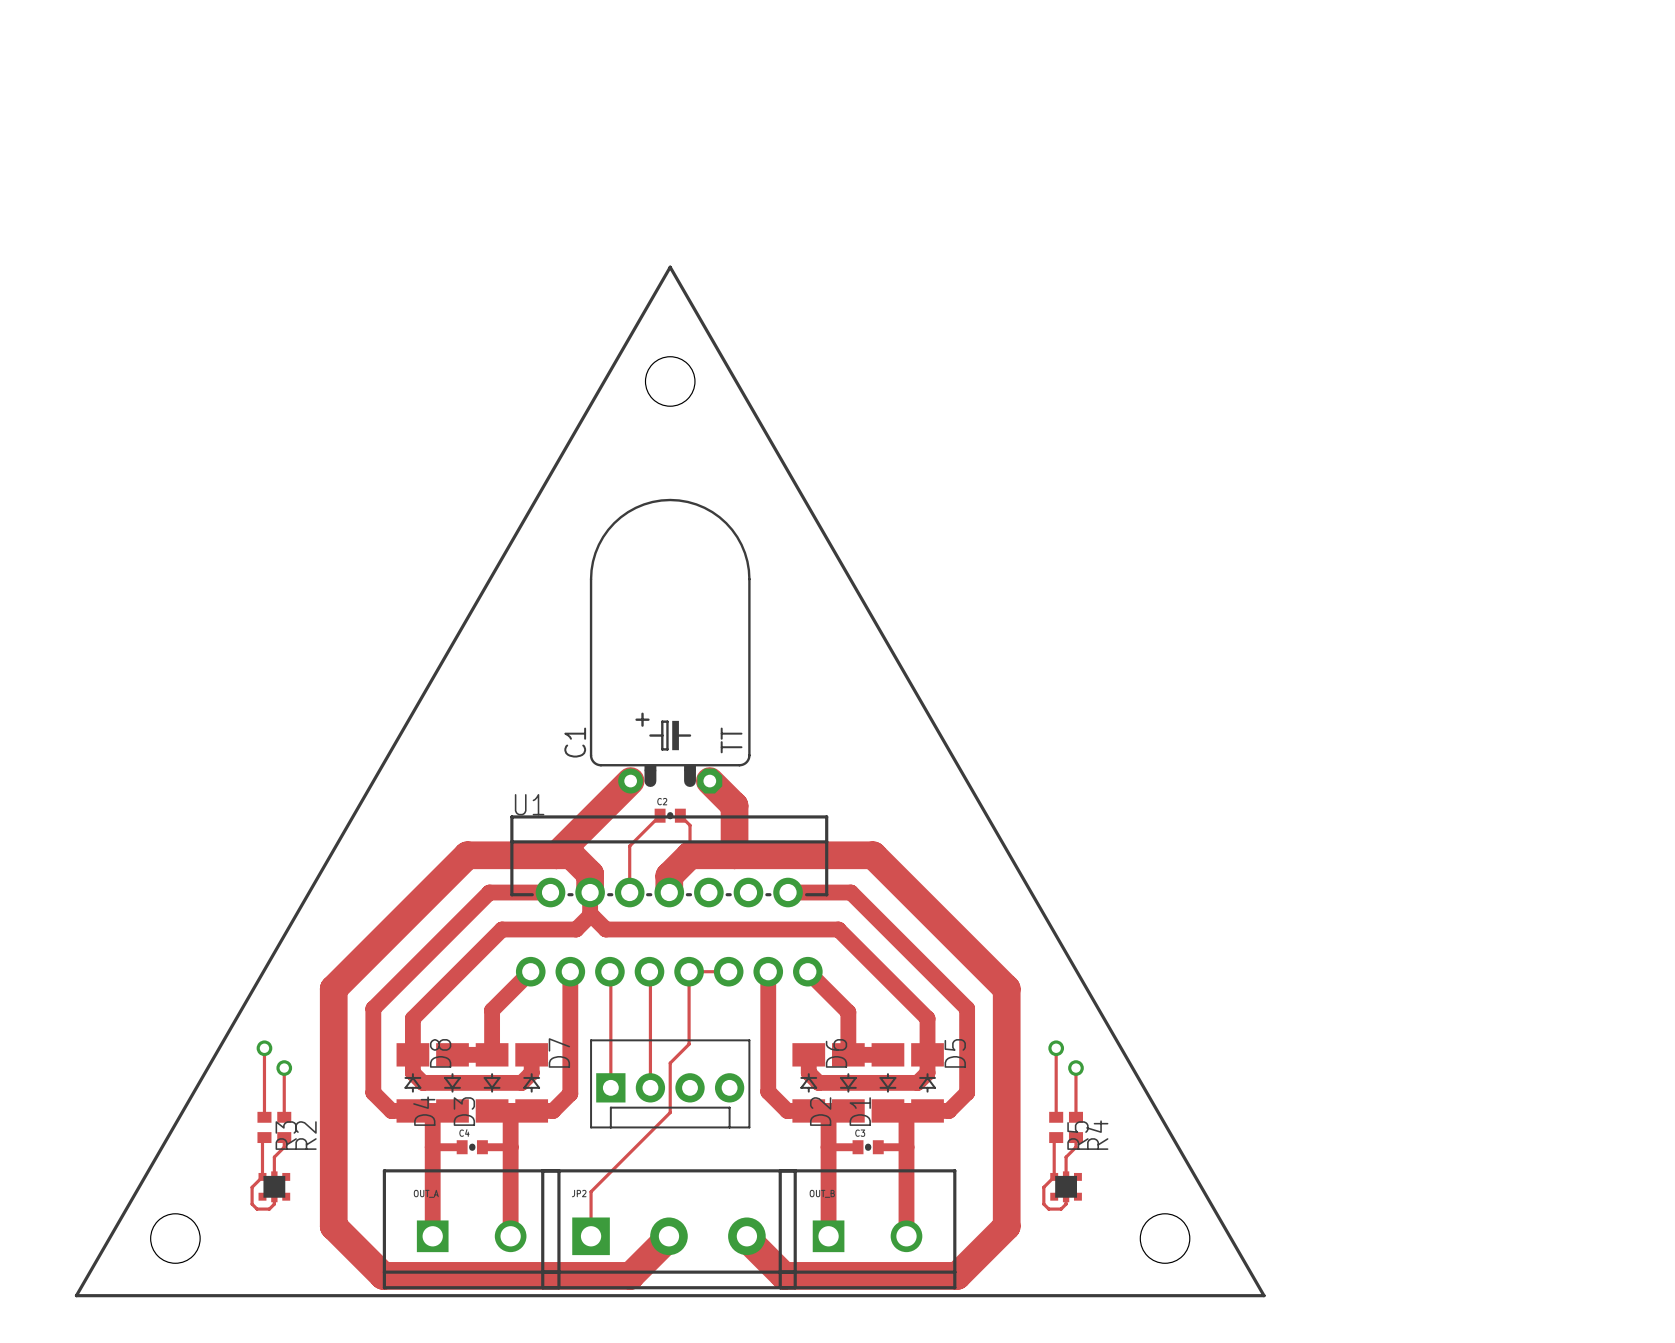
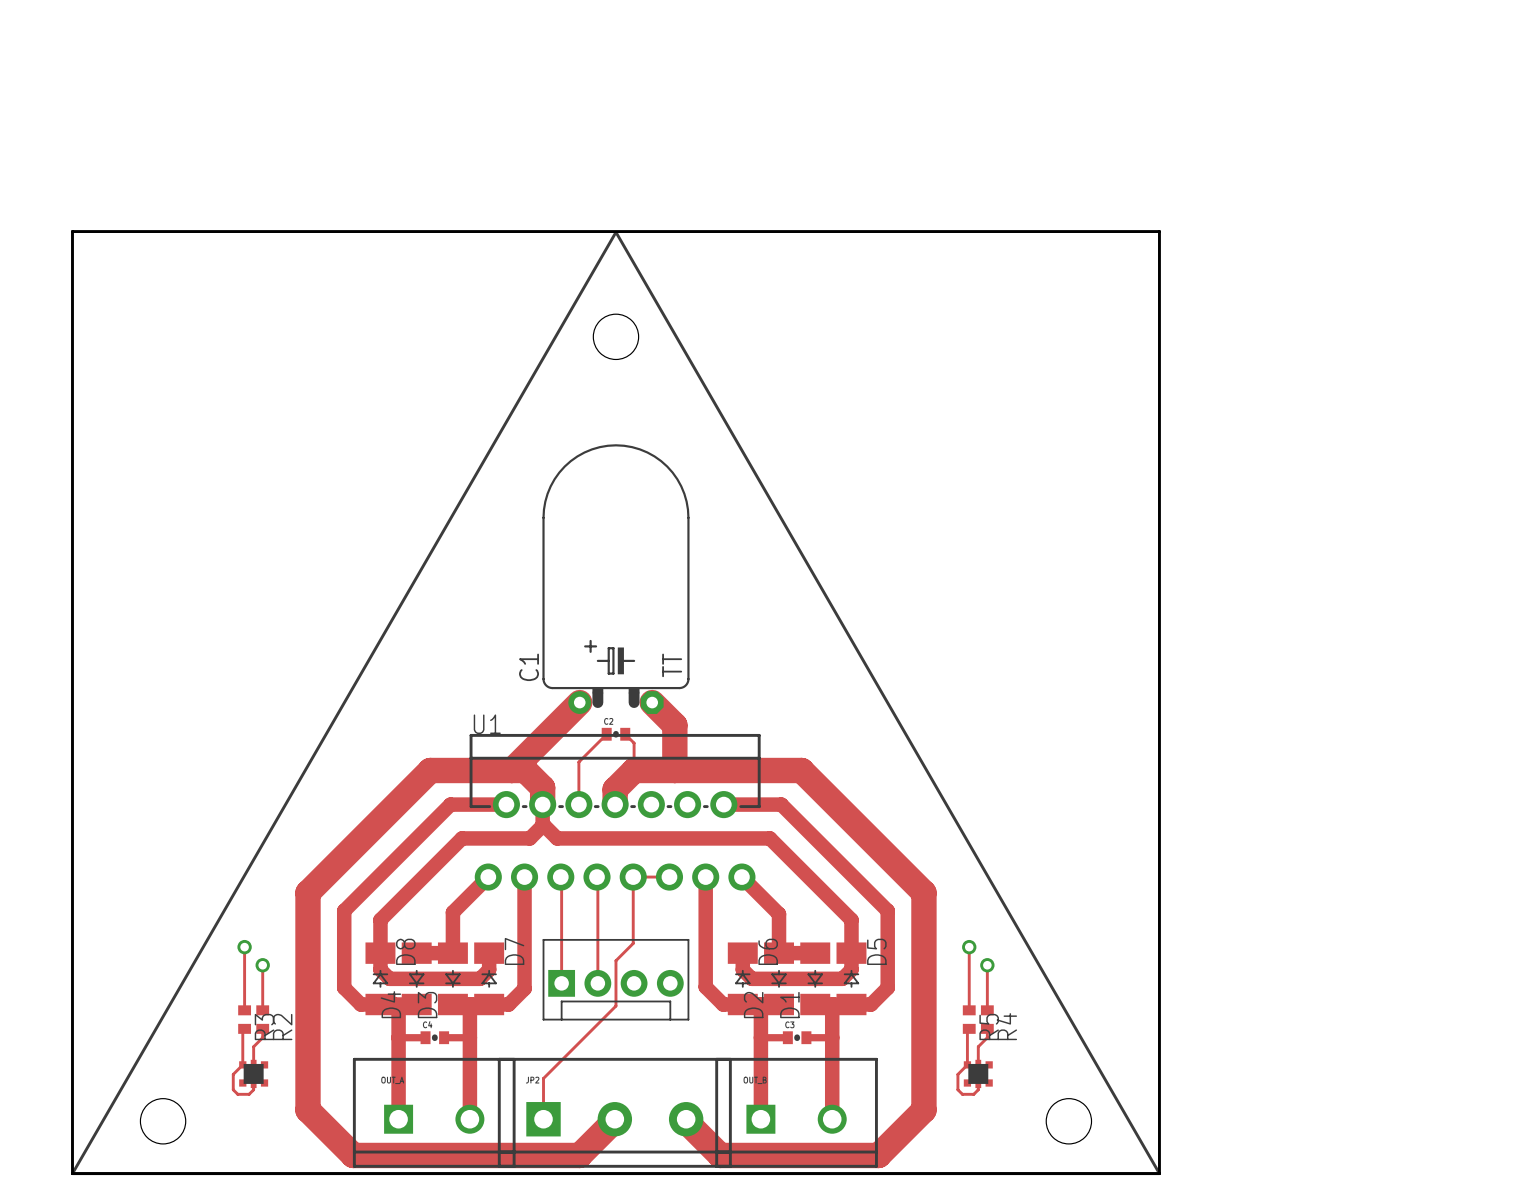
board edge: none -> (72, 231) (72, 1173) (1159, 1173) (1159, 231) (72, 231)

